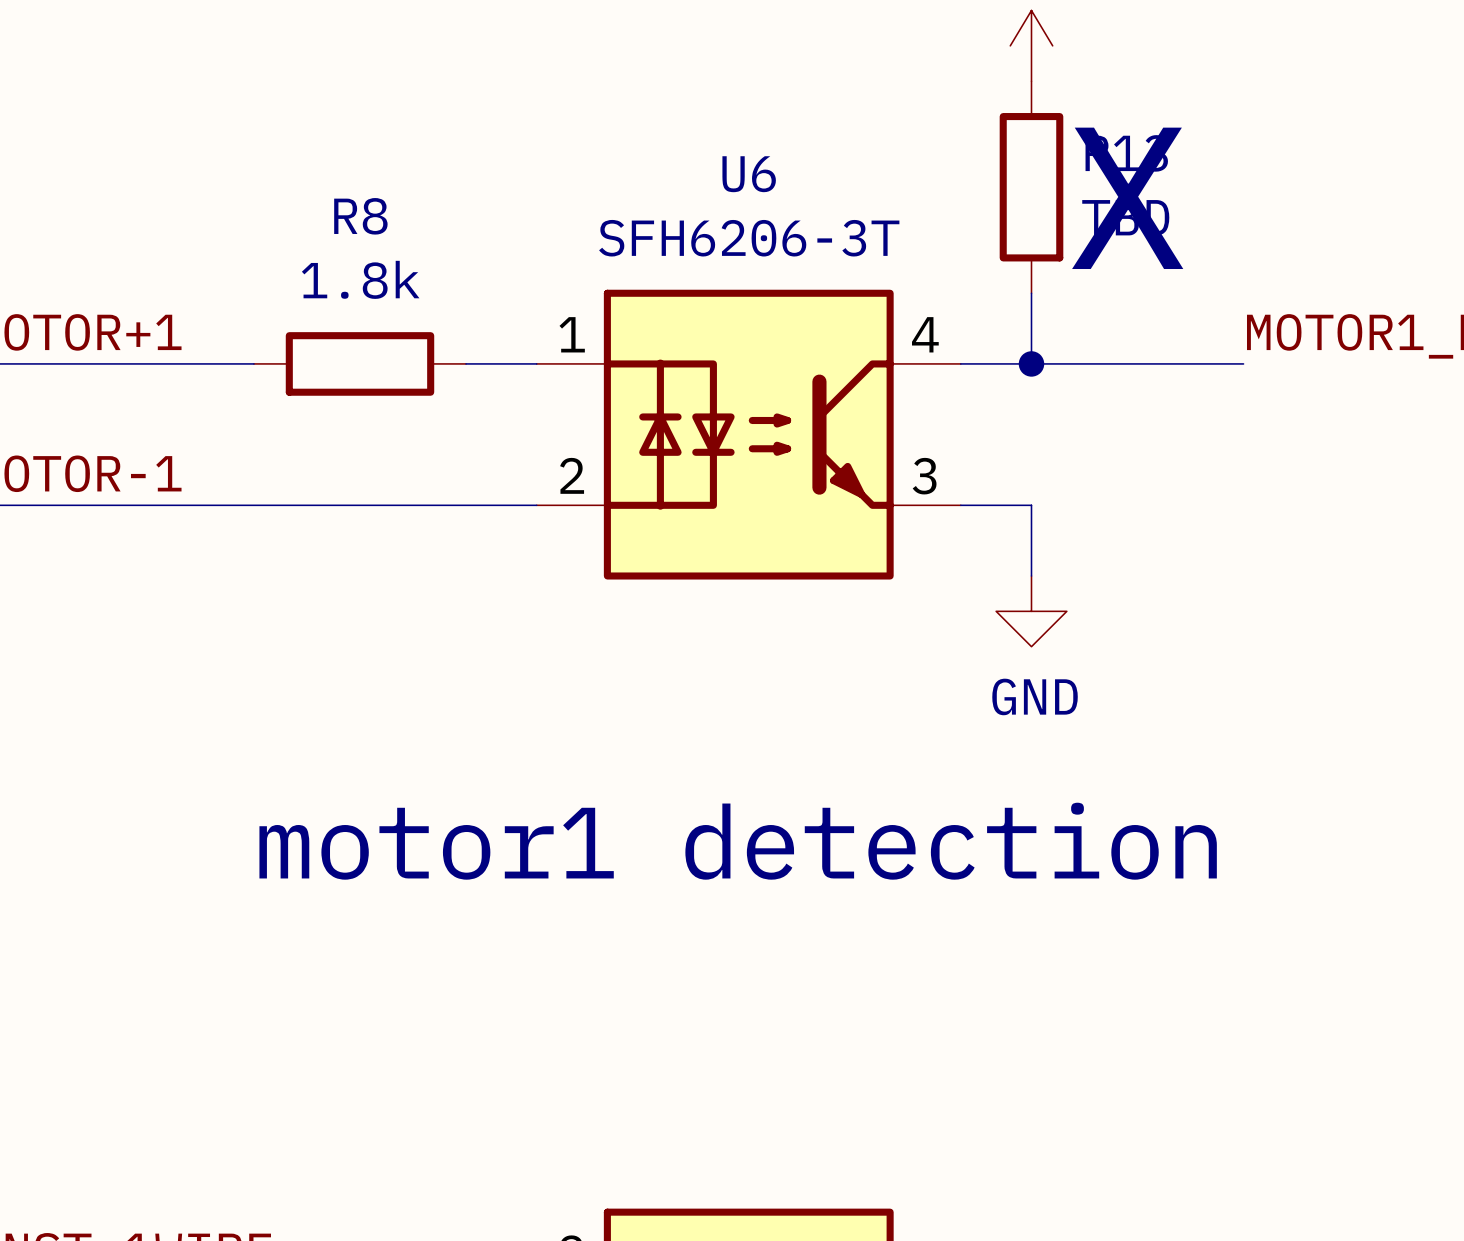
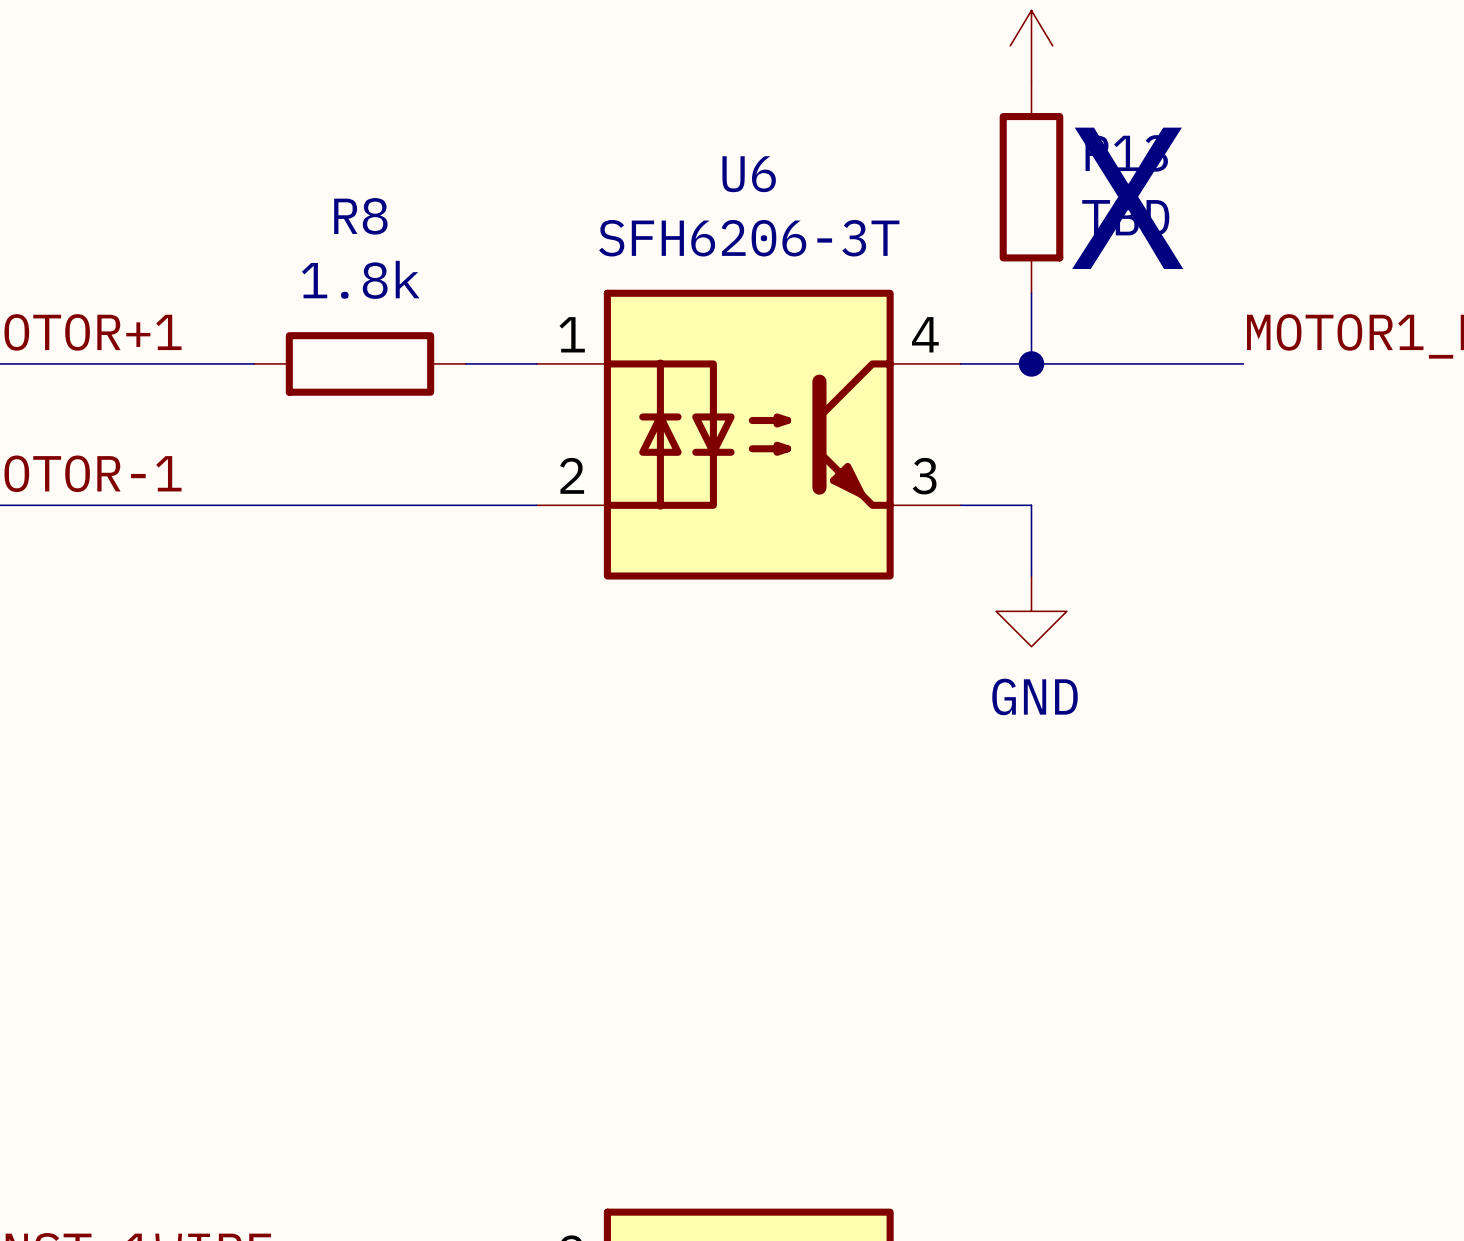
text: motor1 detection (738, 841) -> none

